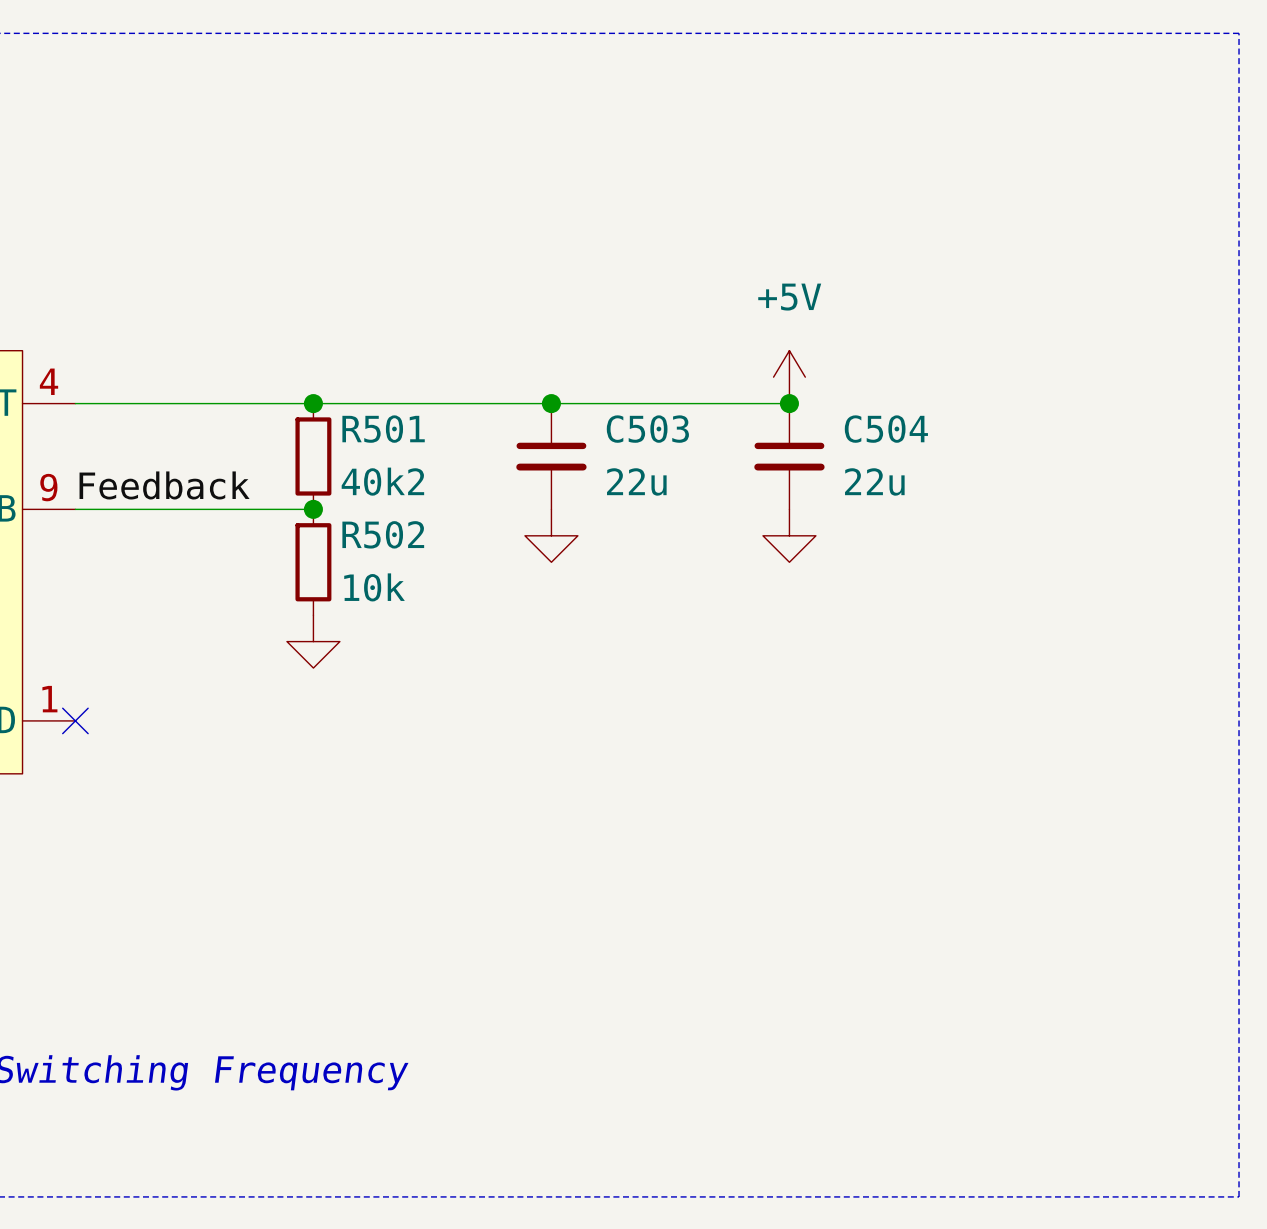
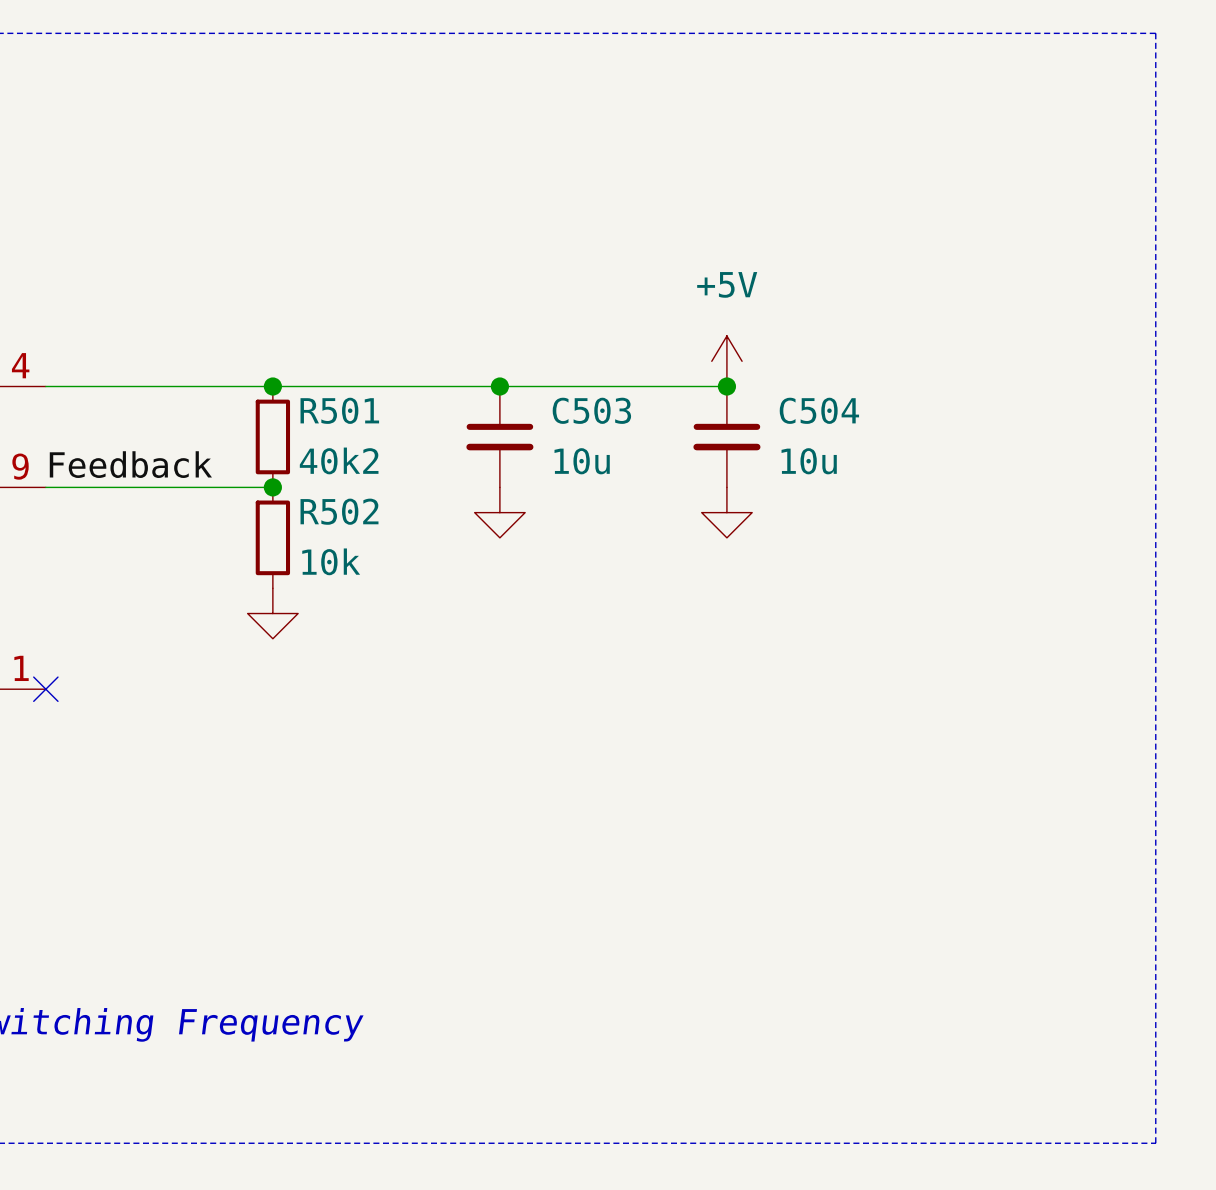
C503 value: 22u (636, 481) -> 10u (582, 461)
C504 value: 22u (874, 481) -> 10u (809, 461)

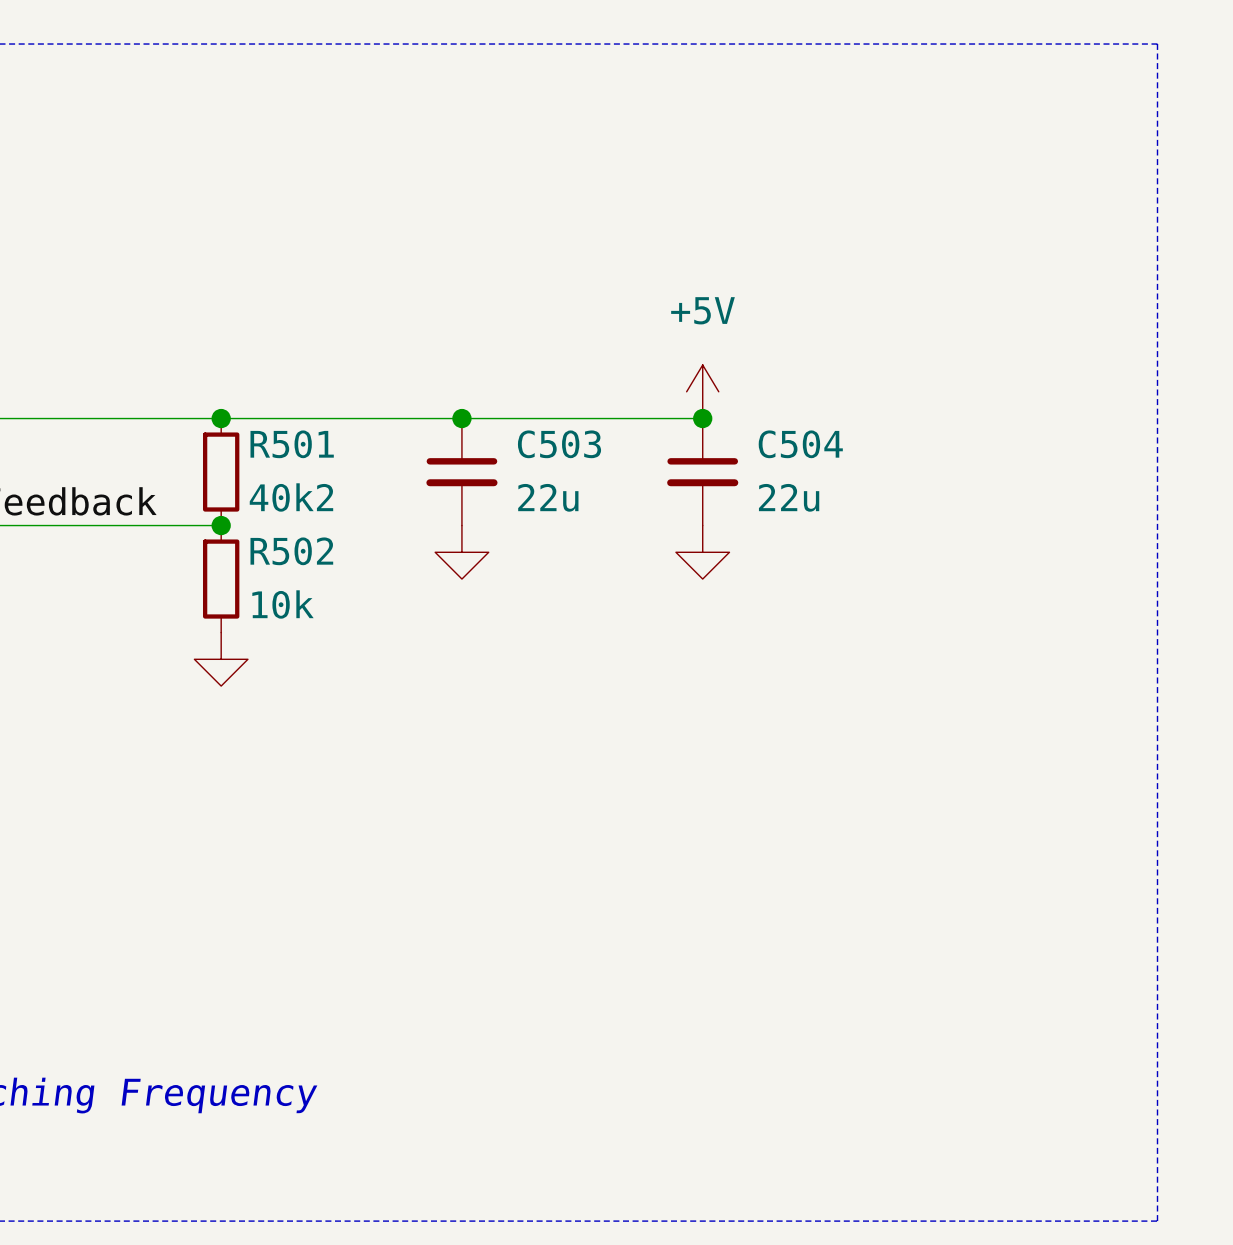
C503 value: 10u (582, 461) -> 22u (548, 497)
C504 value: 10u (809, 461) -> 22u (789, 497)

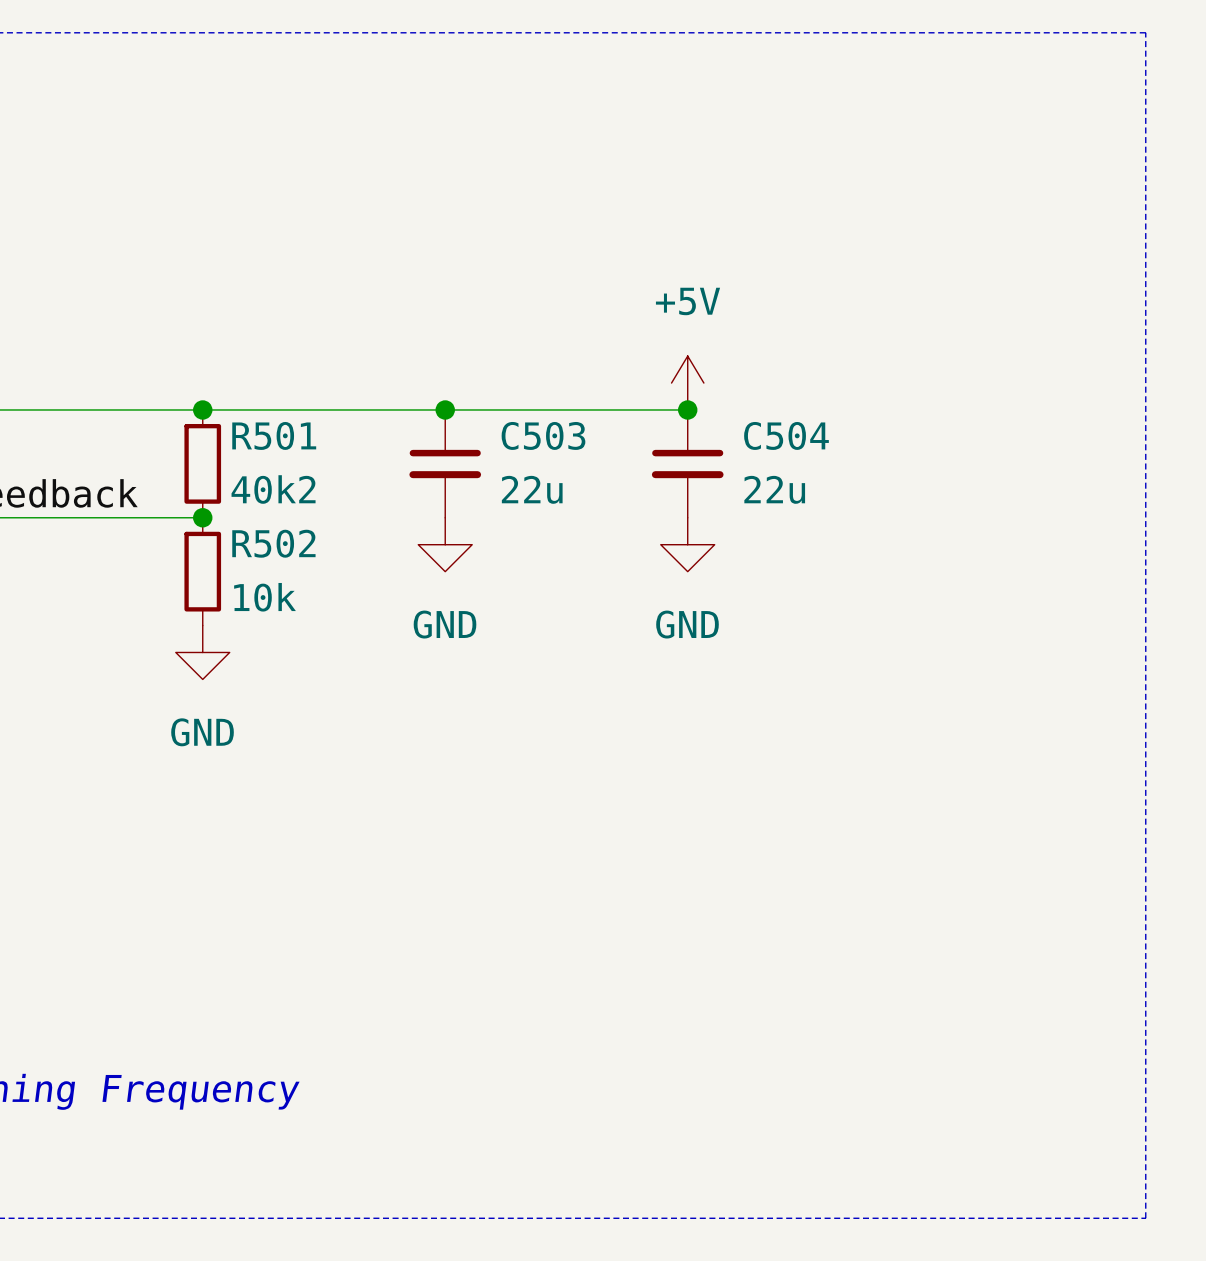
power symbol text: none -> GND (445, 624)
power symbol text: none -> GND (687, 624)
power symbol text: none -> GND (202, 732)

